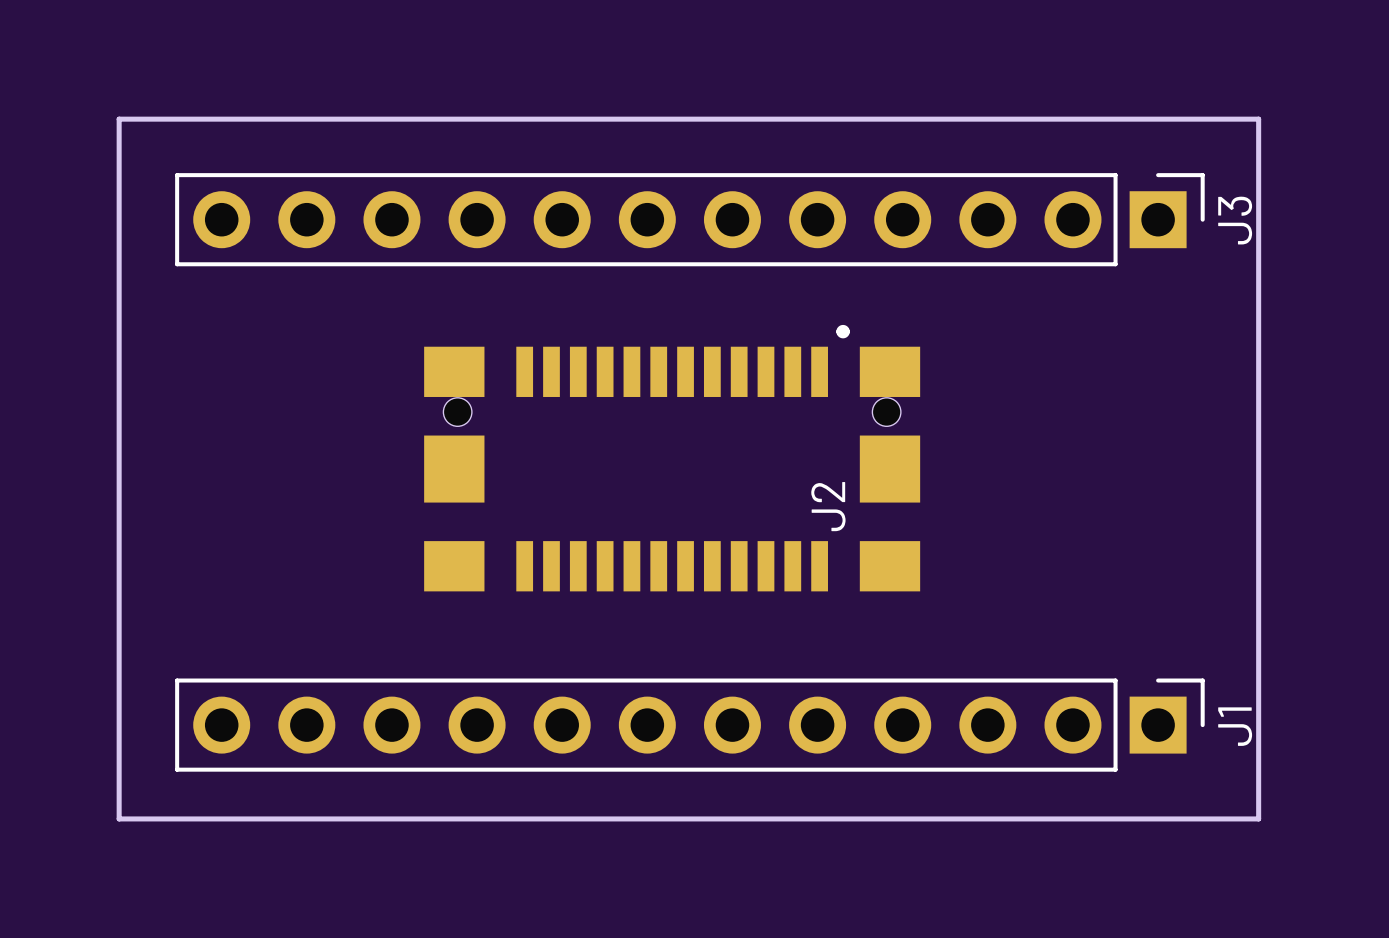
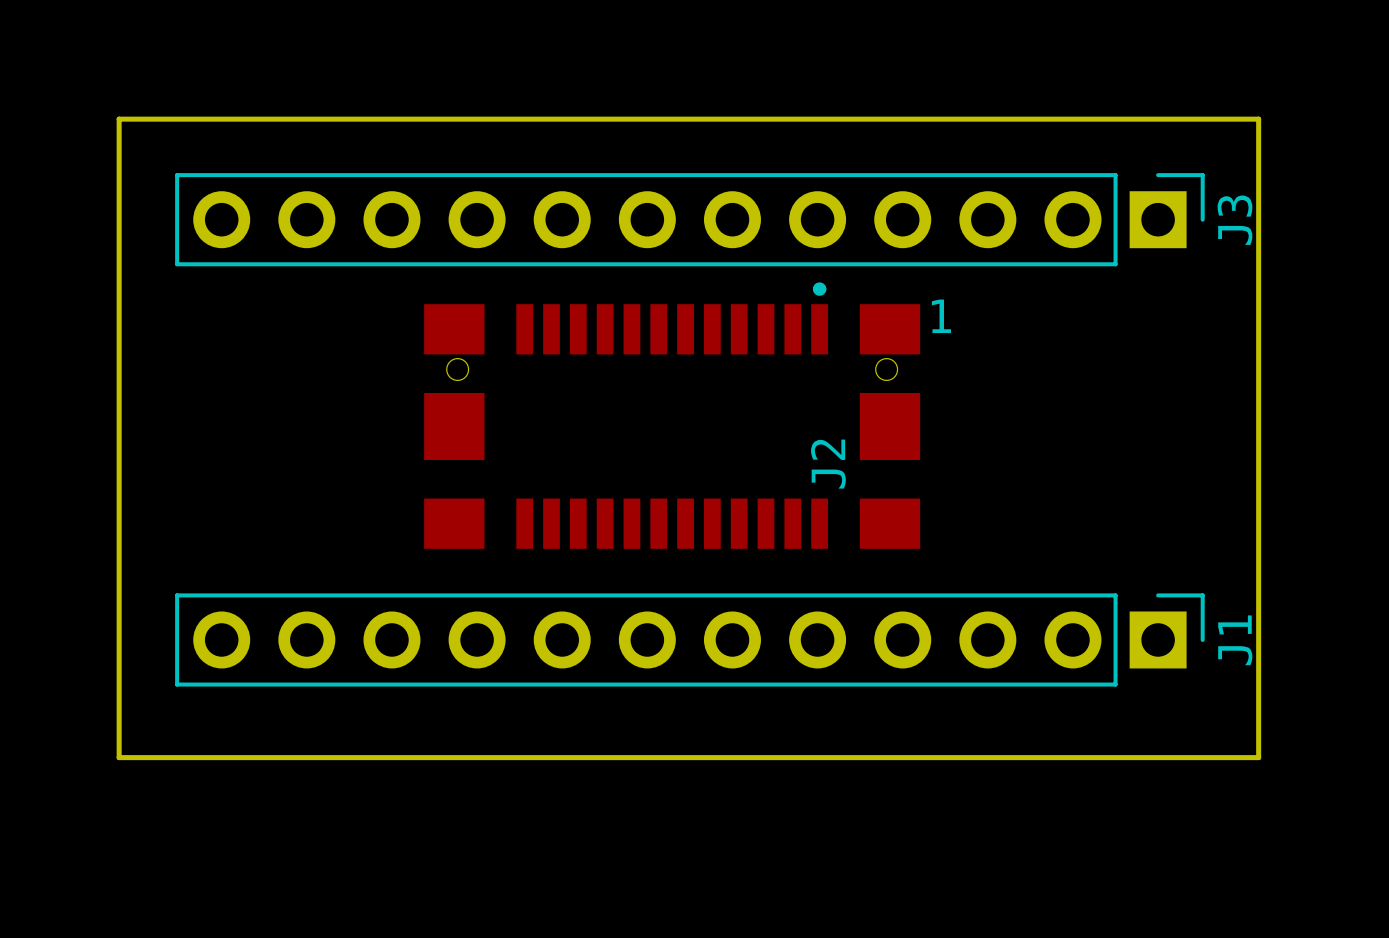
J2 footprint: [424, 324, 921, 592] -> [424, 282, 921, 549]
J1 position: (689, 725) -> (689, 639)
board edge: (119, 757) (119, 818) (1258, 818) (1258, 757) -> (119, 757) (1258, 757)

